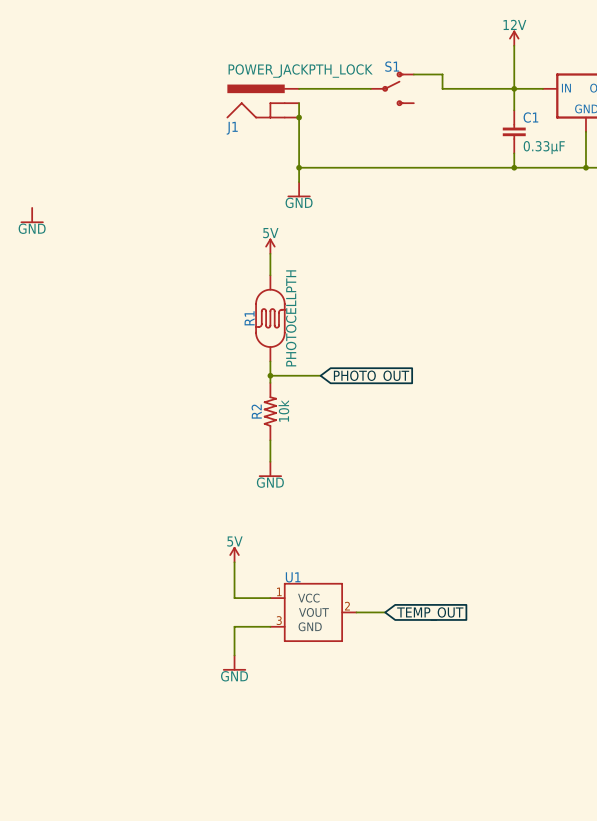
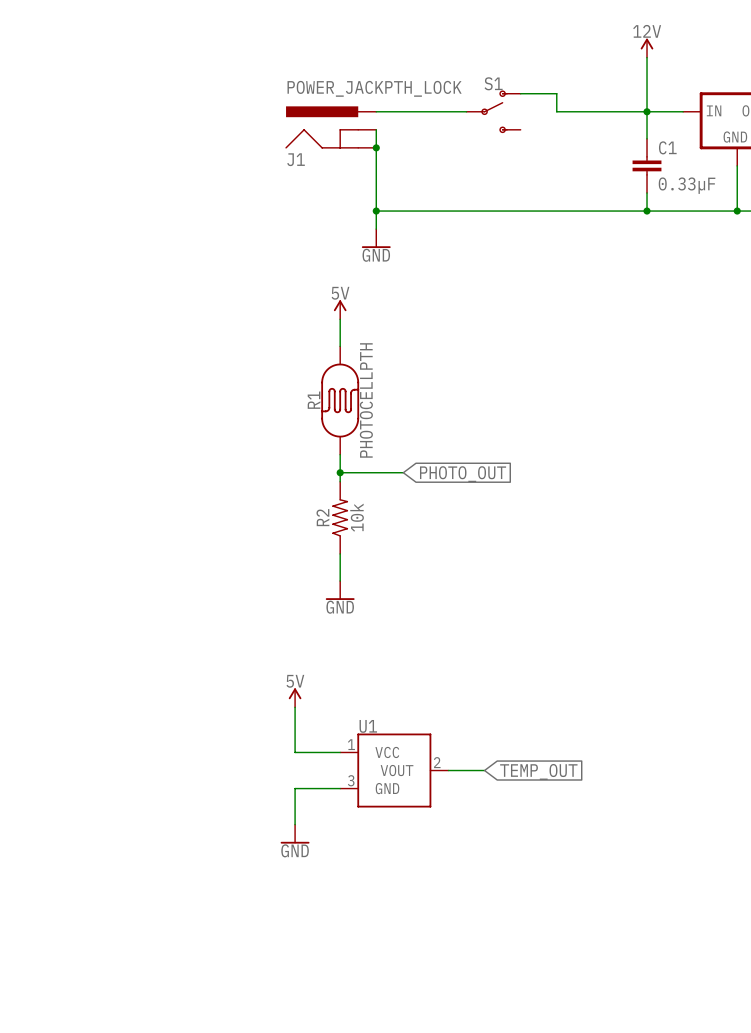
power symbol: GND (32, 215) -> none

